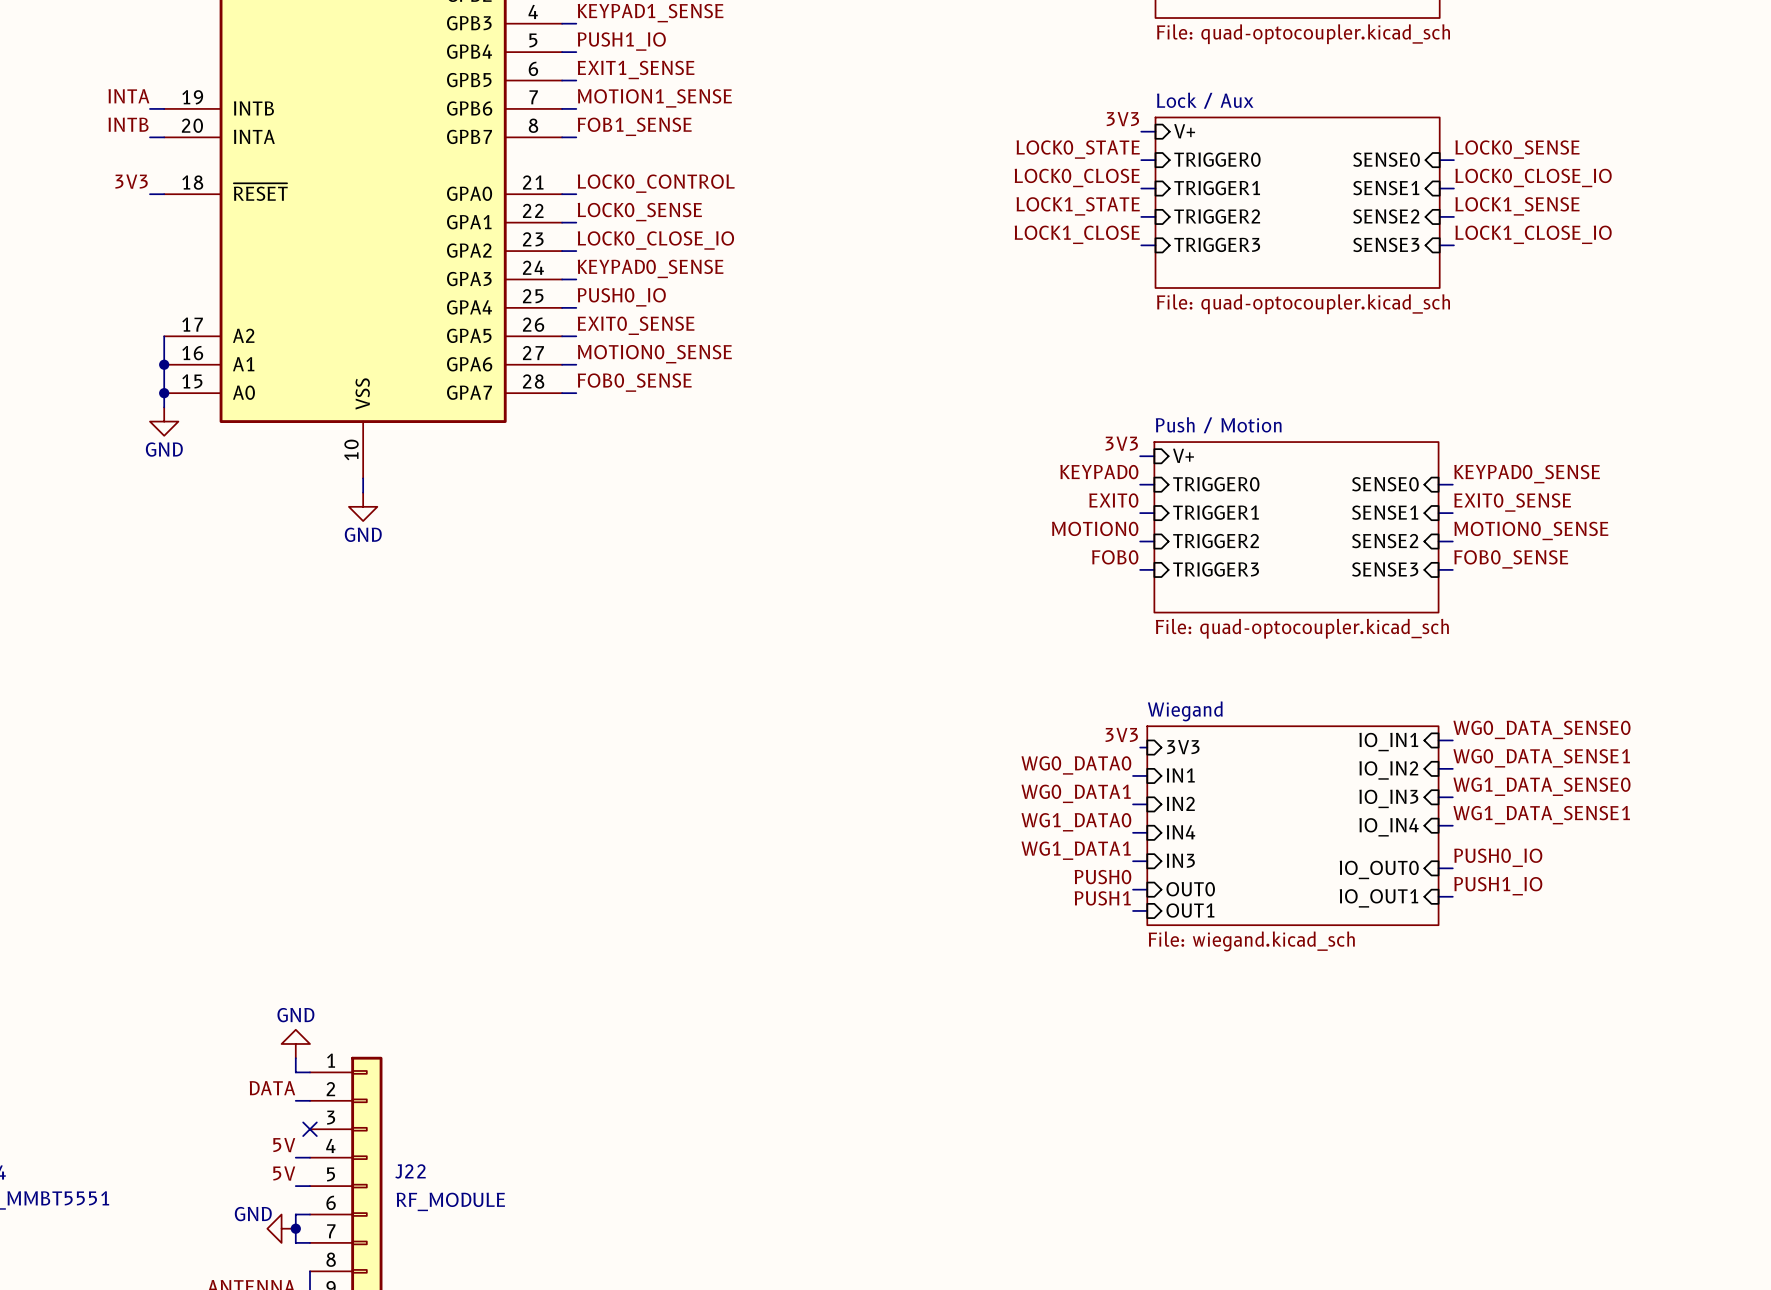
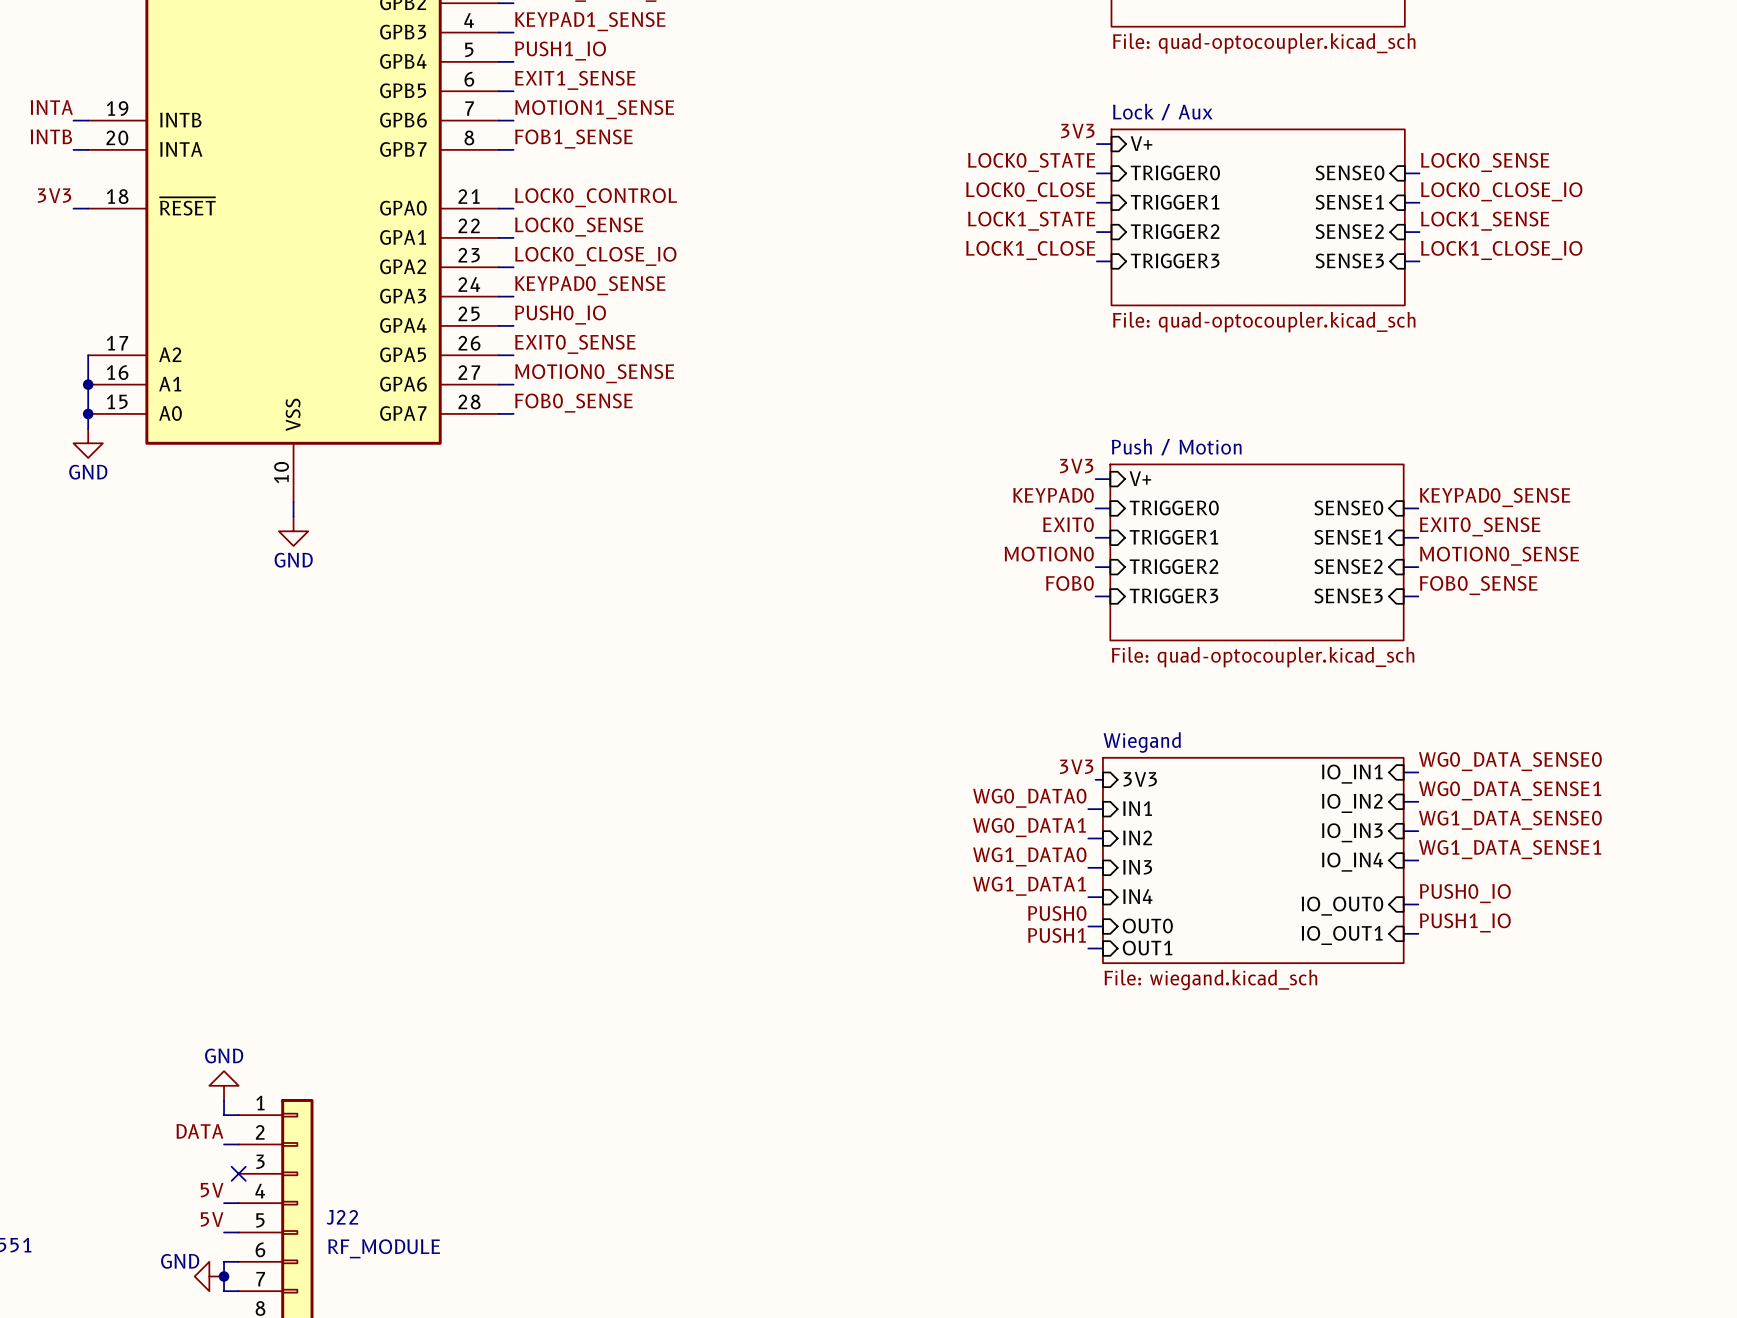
sheet pin: IN4 (1181, 832) -> IN3 (1137, 867)
sheet pin: IN3 (1180, 860) -> IN4 (1137, 896)

